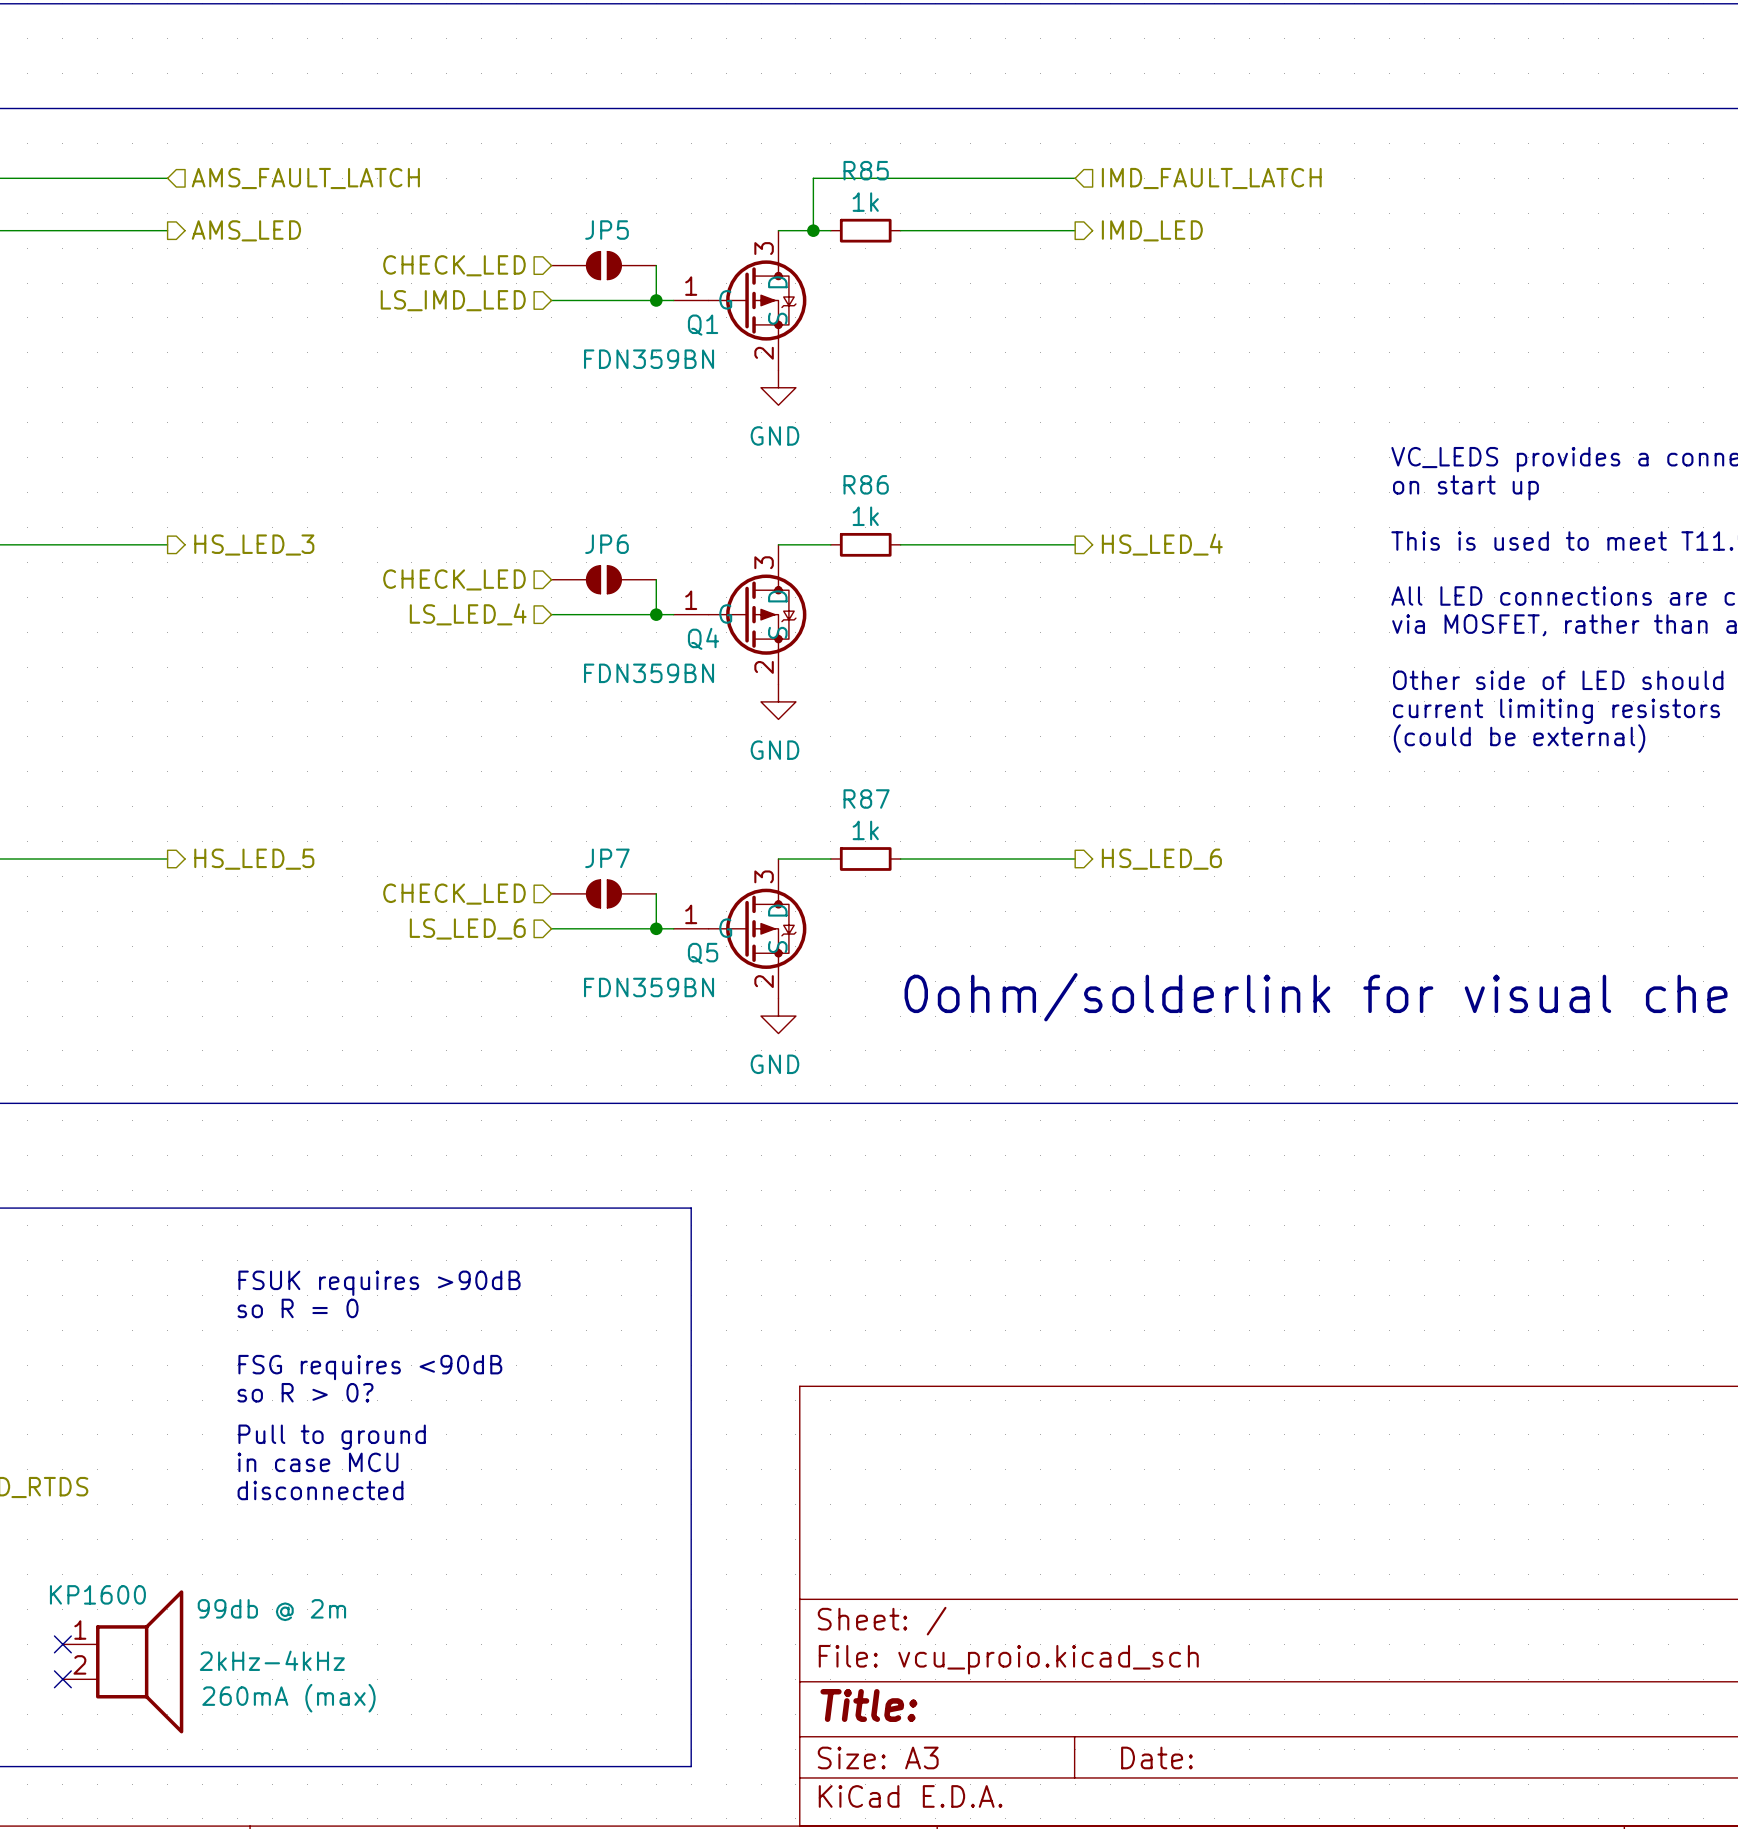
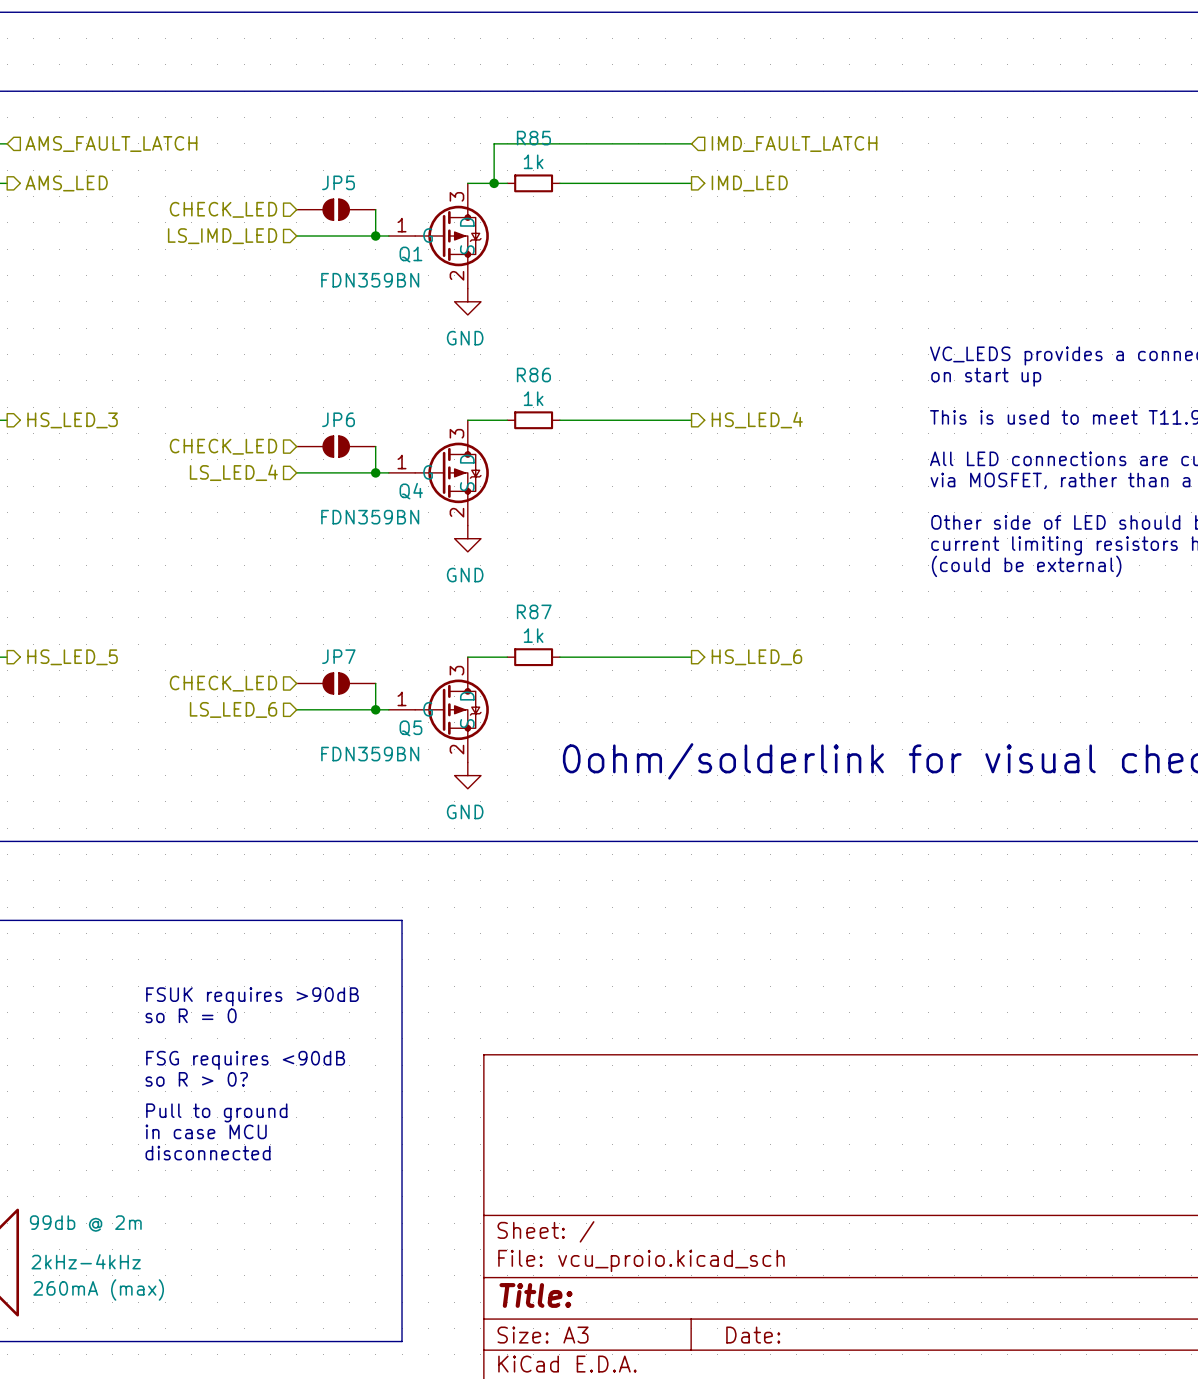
text position: FSUK requires >90dB (379, 1283) -> FSUK requires >90dB (252, 996)
text position: so R = 0 (298, 1308) -> so R = 0 (191, 1015)
text position: FSG requires <90dB (370, 1367) -> FSG requires <90dB (245, 1060)
text position: so R > 0? (305, 1392) -> so R > 0? (196, 1079)
text position: Pull to ground (332, 1437) -> Pull to ground (216, 1112)
text position: in case MCU (317, 1462) -> in case MCU (206, 1131)
text position: disconnected (320, 1490) -> disconnected (208, 1153)

